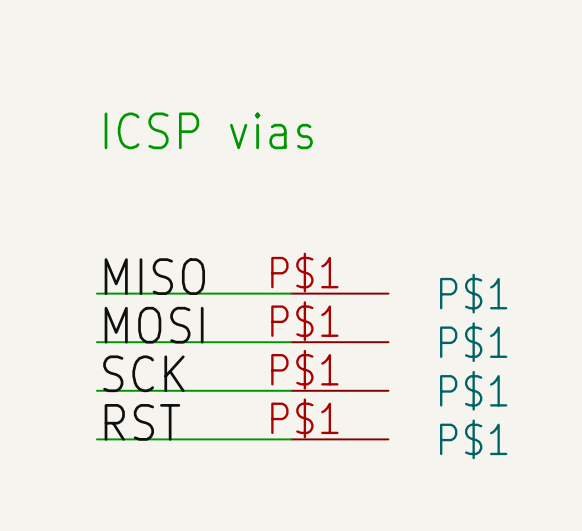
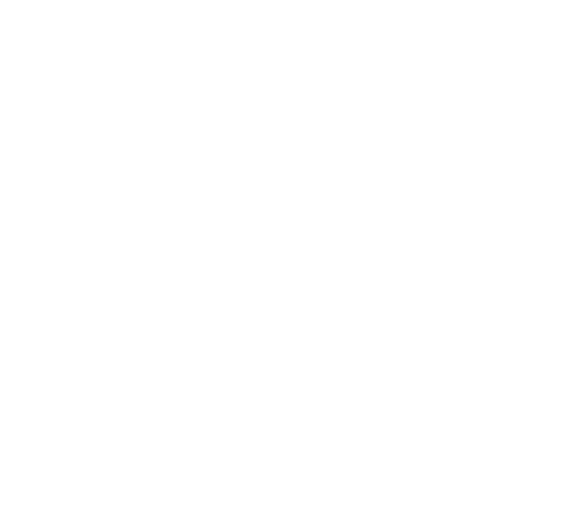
text: ICSP vias (208, 130) -> none
label: MISO (154, 276) -> none
wire: (96, 293) (291, 293) -> none
part: (339, 293) -> none
label: MOSI (154, 325) -> none
wire: (96, 342) (291, 342) -> none
part: (339, 342) -> none
label: SCK (143, 373) -> none
wire: (96, 390) (291, 390) -> none
part: (339, 390) -> none
label: RST (142, 422) -> none
wire: (96, 439) (291, 439) -> none
part: (339, 439) -> none

